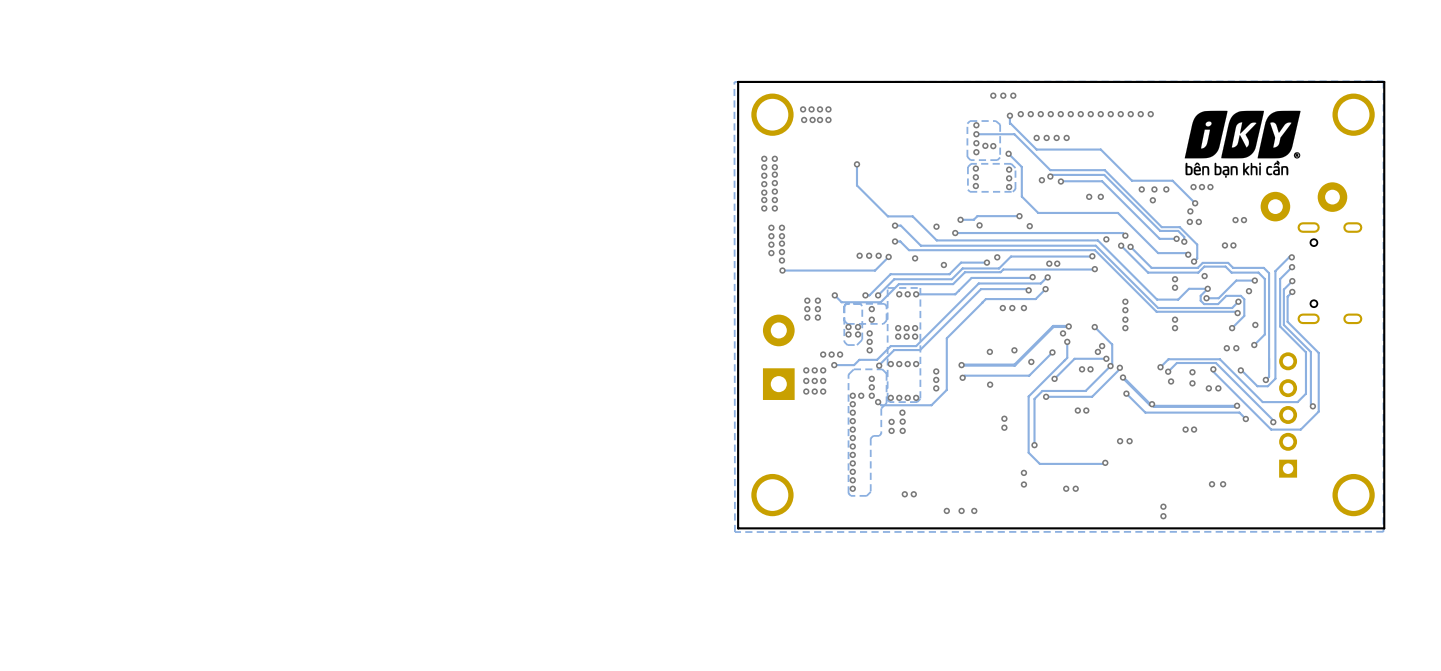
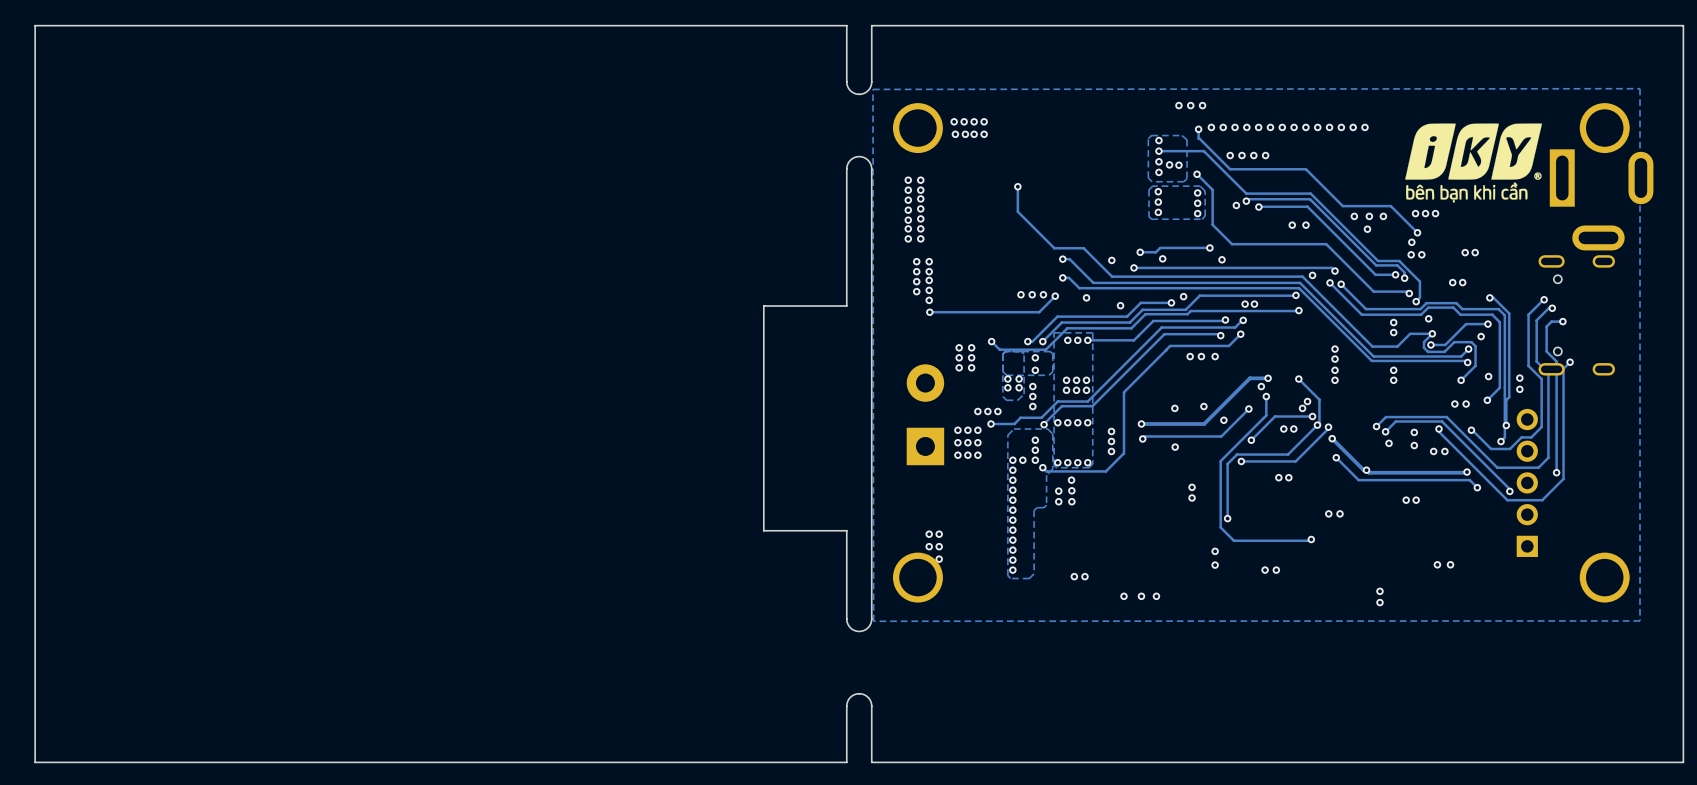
board edge: none -> (1683, 25) (871, 25) (871, 83) (866, 91) (859, 94) (851, 91) (847, 84) (846, 25) (35, 25) (35, 762) (846, 762) (847, 703) (851, 696) (859, 693) (866, 696) (871, 704) (871, 762) (1683, 762) (1683, 25)
board edge: (1384, 81) (738, 81) (738, 528) (1384, 528) (1384, 81) -> none
board edge: none -> (871, 169) (871, 618) (868, 627) (859, 631) (851, 628) (846, 620) (846, 530) (763, 530) (763, 306) (846, 306) (846, 167) (851, 159) (859, 156) (868, 160) (871, 169)
part: none -> (1601, 199)
part: (1332, 197) -> none
part: (1275, 206) -> none
track: (1291, 257) (1289, 257) (1275, 271) (1275, 378) (1267, 386) -> (1544, 299) (1528, 314) (1528, 365) (1541, 379) (1541, 427) (1531, 437) (1521, 437) (1510, 448) (1503, 448)
via: (1291, 257) -> none
track: none -> (1489, 297) (1493, 297) (1509, 313) (1509, 397) (1506, 400) (1506, 425)
via: none -> (1489, 297)
via: none -> (1544, 299)
track: (1292, 267) (1280, 279) (1280, 326) (1305, 352) -> (1552, 308) (1548, 308) (1536, 320) (1536, 361) (1548, 373) (1548, 408)
via: (1292, 267) -> none
via: none -> (1552, 308)
via: none -> (1562, 321)
track: (1292, 281) (1283, 289) (1283, 324) (1310, 351) (1310, 404) (1312, 406) -> (1562, 321) (1551, 321) (1546, 326) (1546, 351) (1556, 361) (1556, 472)
via: (1292, 281) -> none
track: (1292, 291) (1287, 296) (1287, 321) (1318, 352) -> (1570, 362) (1563, 368) (1563, 409)
via: (1292, 291) -> none
via: none -> (1570, 362)
via: none -> (1519, 378)
via: none -> (1519, 389)
via: none -> (1506, 425)
via: none -> (929, 534)
via: none -> (939, 534)
via: none -> (929, 546)
via: none -> (939, 546)
via: none -> (939, 559)

